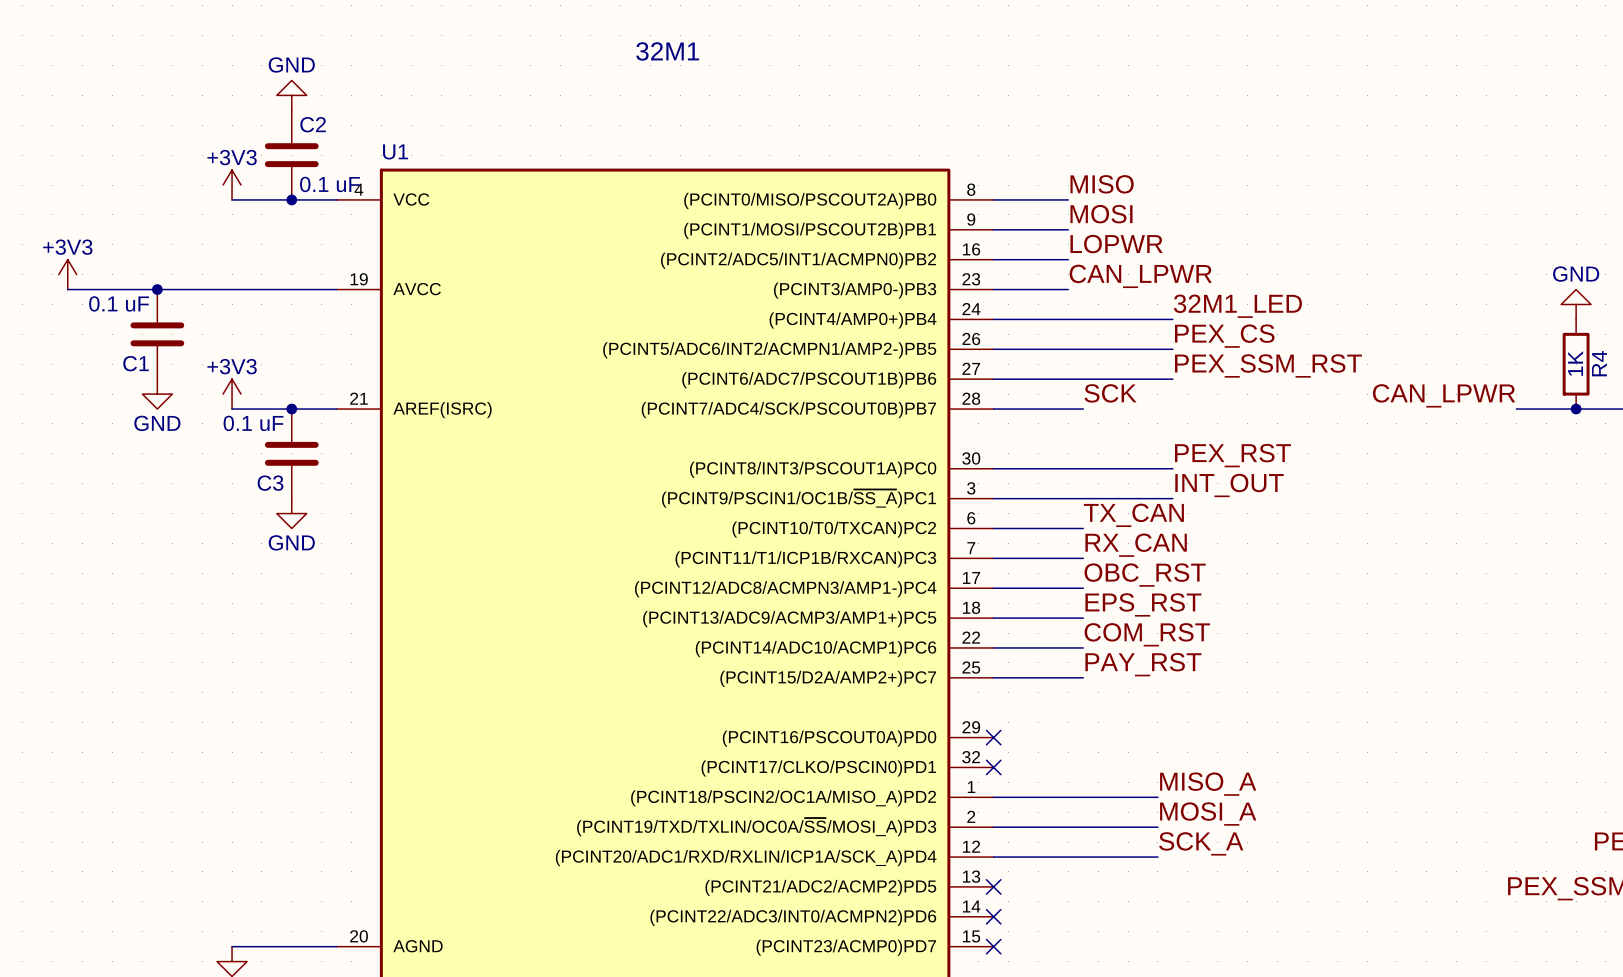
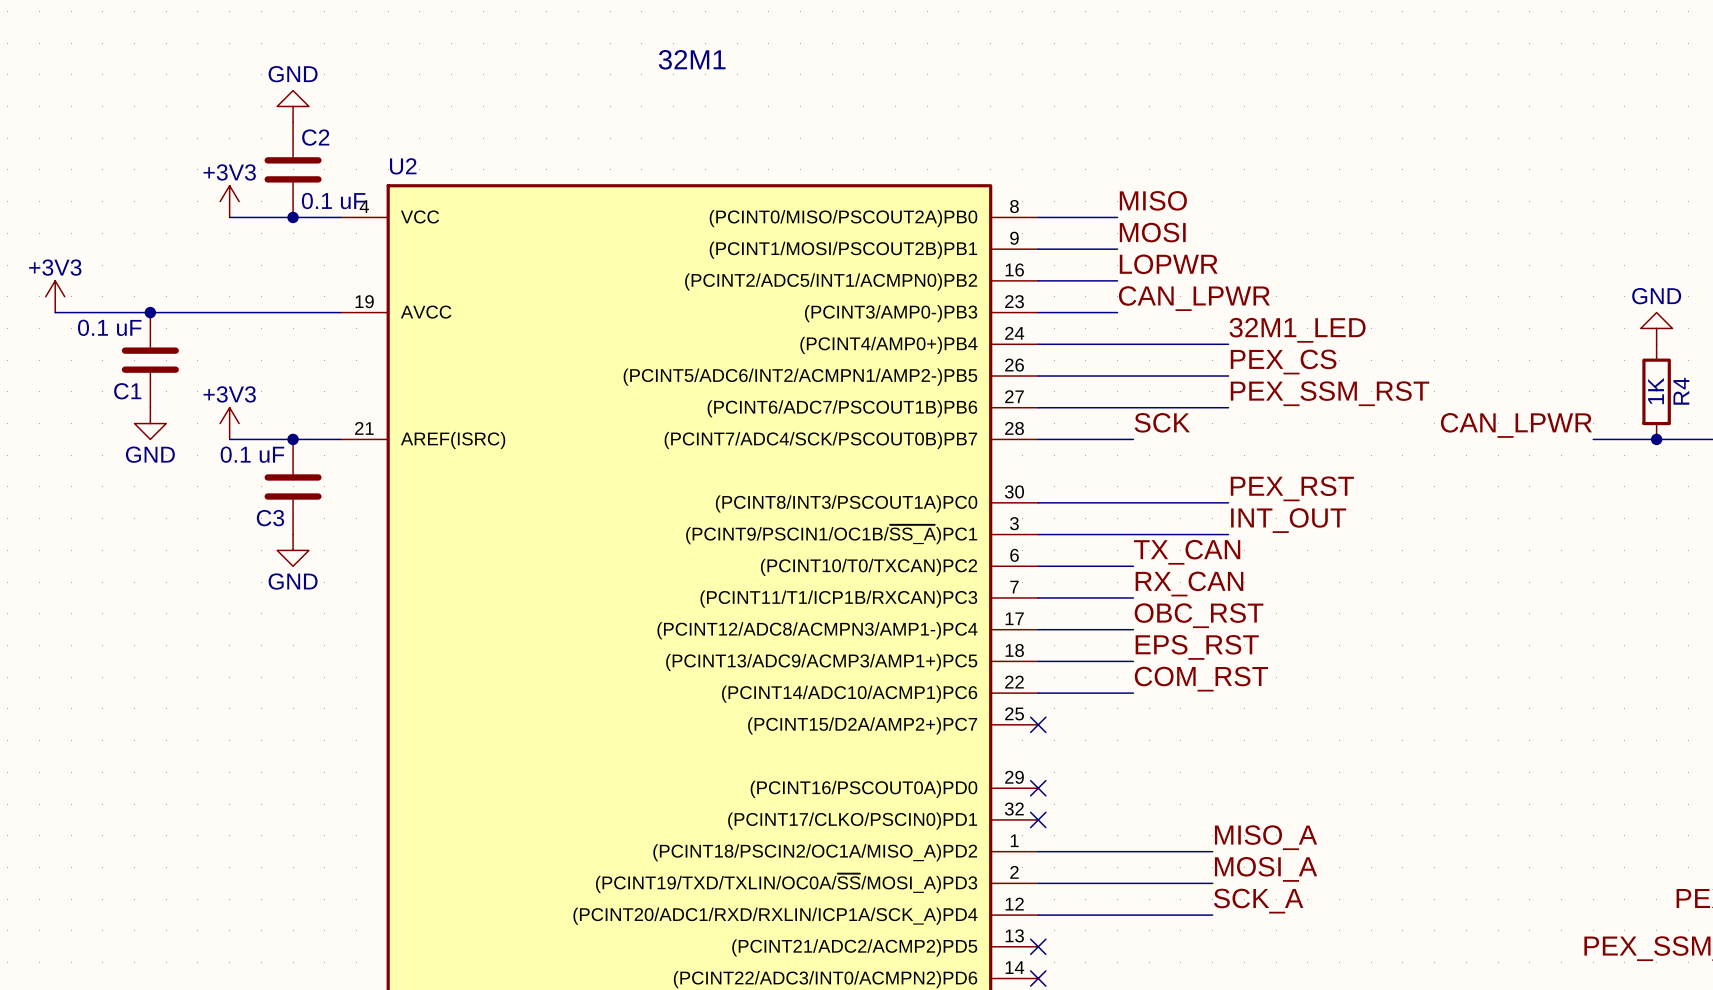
U1 name: U1 (395, 151) -> U2 (403, 166)
label: PAY_RST (1143, 664) -> none
wire: (993, 677) (1083, 677) -> none
no-connect mark: none -> (1038, 724)

